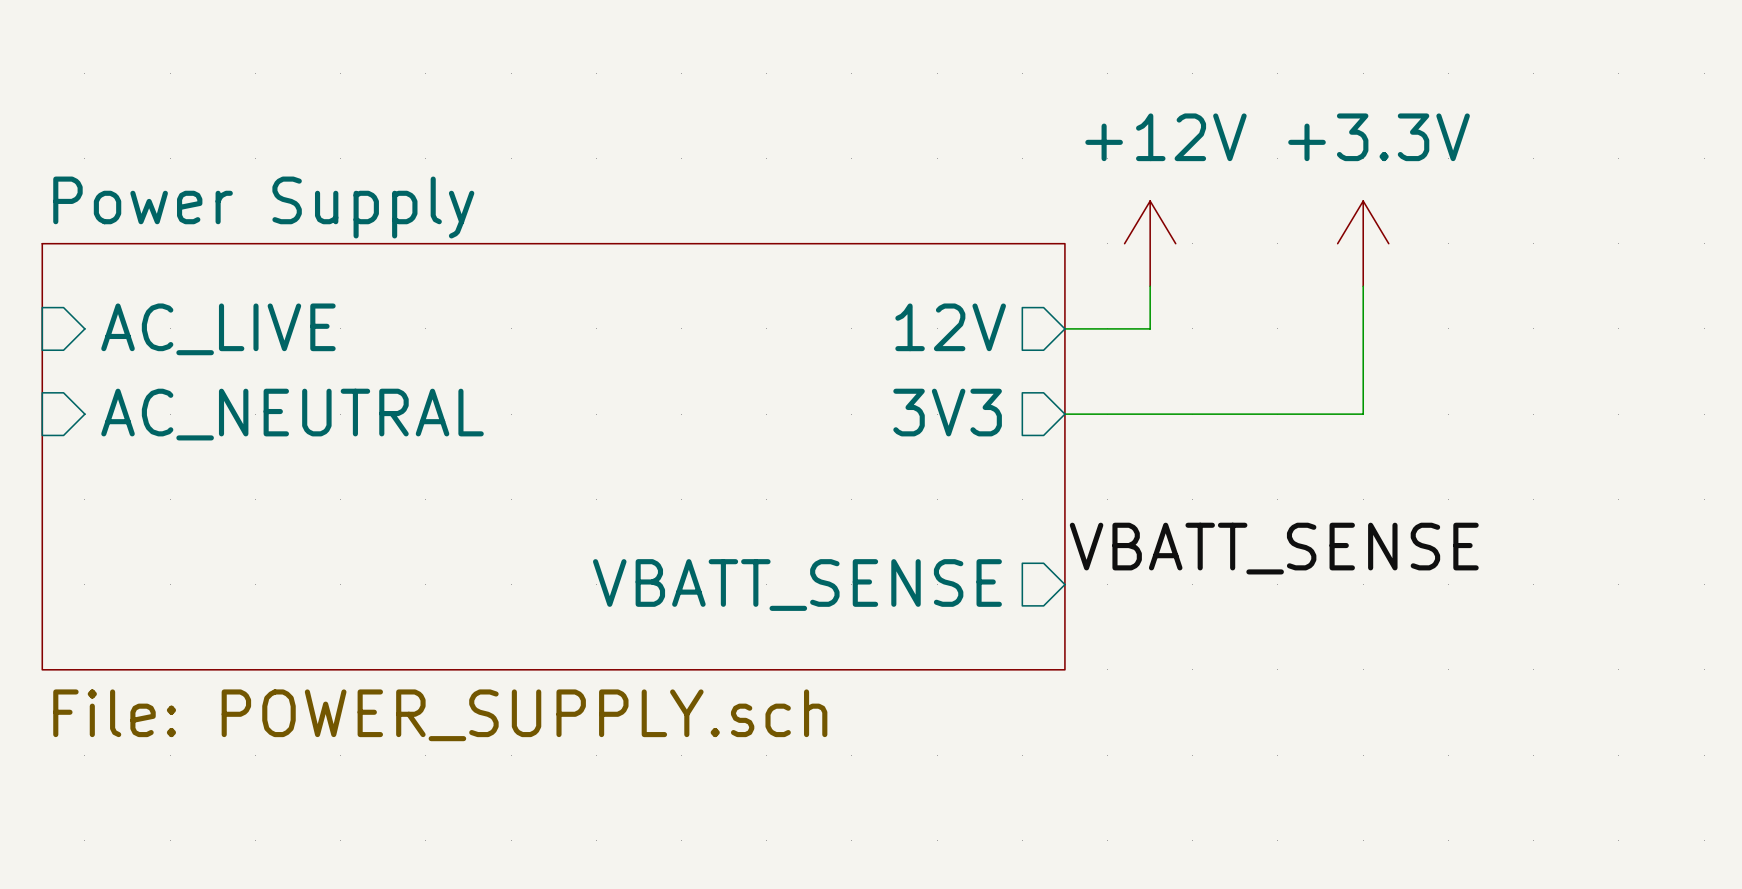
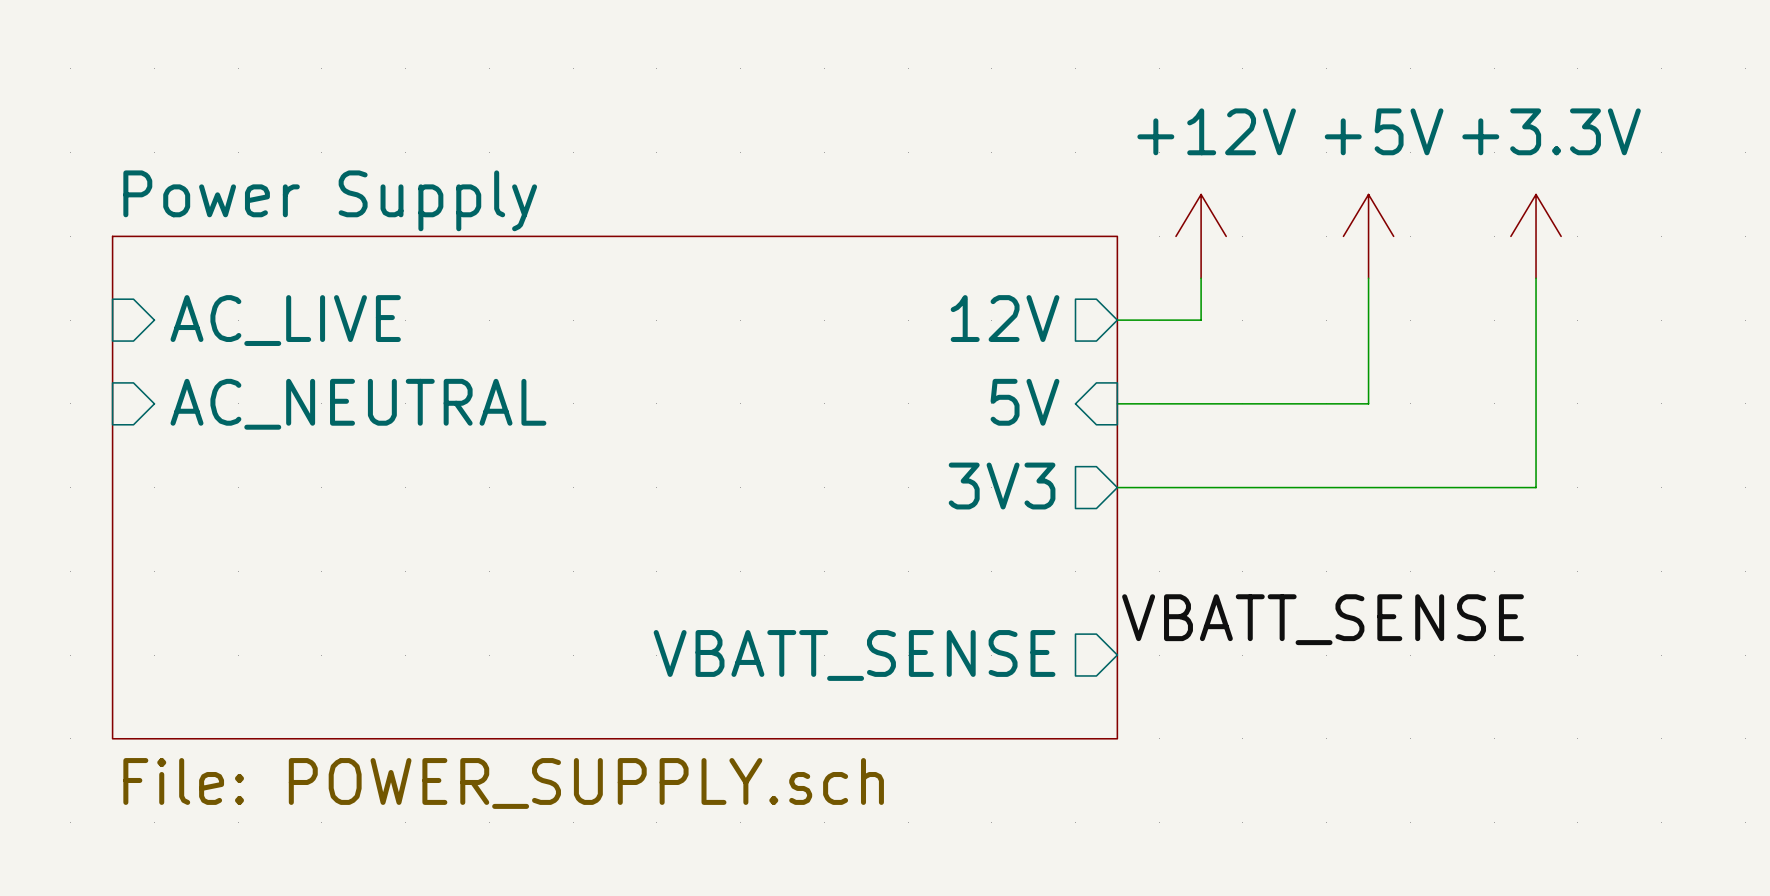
power symbol: none -> +5V (1368, 236)
power symbol position: +3.3V (1363, 243) -> +3.3V (1536, 236)
wire: (1363, 286) (1363, 414) (1320, 414) -> (1368, 278) (1368, 403)
wire: none -> (1536, 278) (1536, 487) (1117, 487)
sheet pin shape: output (947, 412) -> input (1025, 402)
sheet pin: 3V3 (947, 412) -> 5V (1025, 402)
sheet Power Supply: File: POWER_SUPPLY.sch (553, 456) -> none
sheet pin: none -> 3V3 (1002, 486)
sheet Power Supply: none -> File: POWER_SUPPLY.sch (614, 487)
label position: VBATT_SENSE (1274, 548) -> VBATT_SENSE (1323, 619)
sheet pin position: VBATT_SENSE (797, 585) -> VBATT_SENSE (854, 655)

